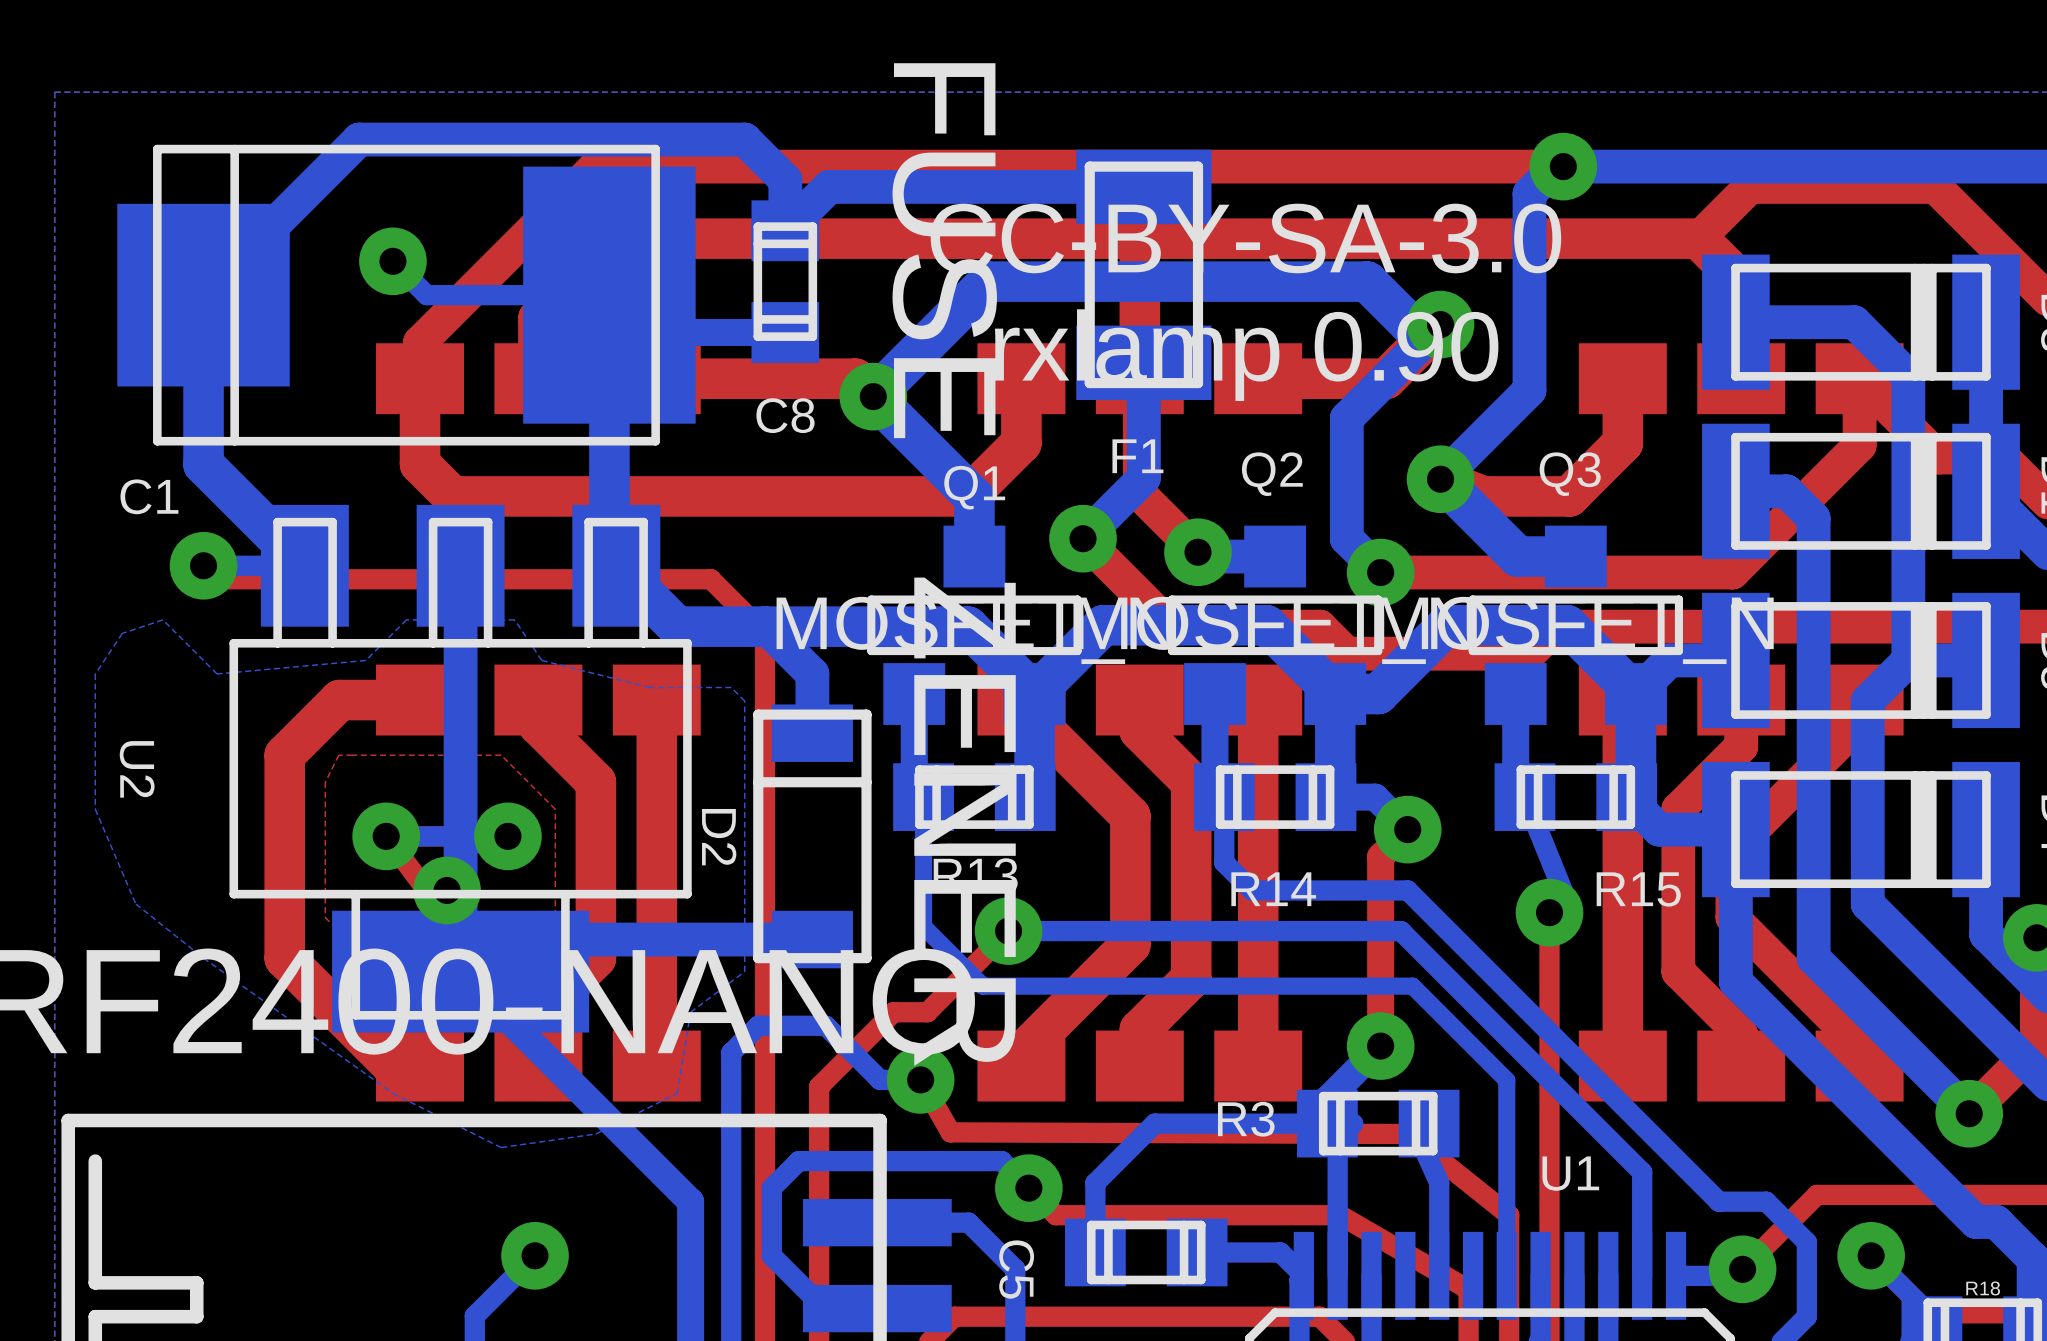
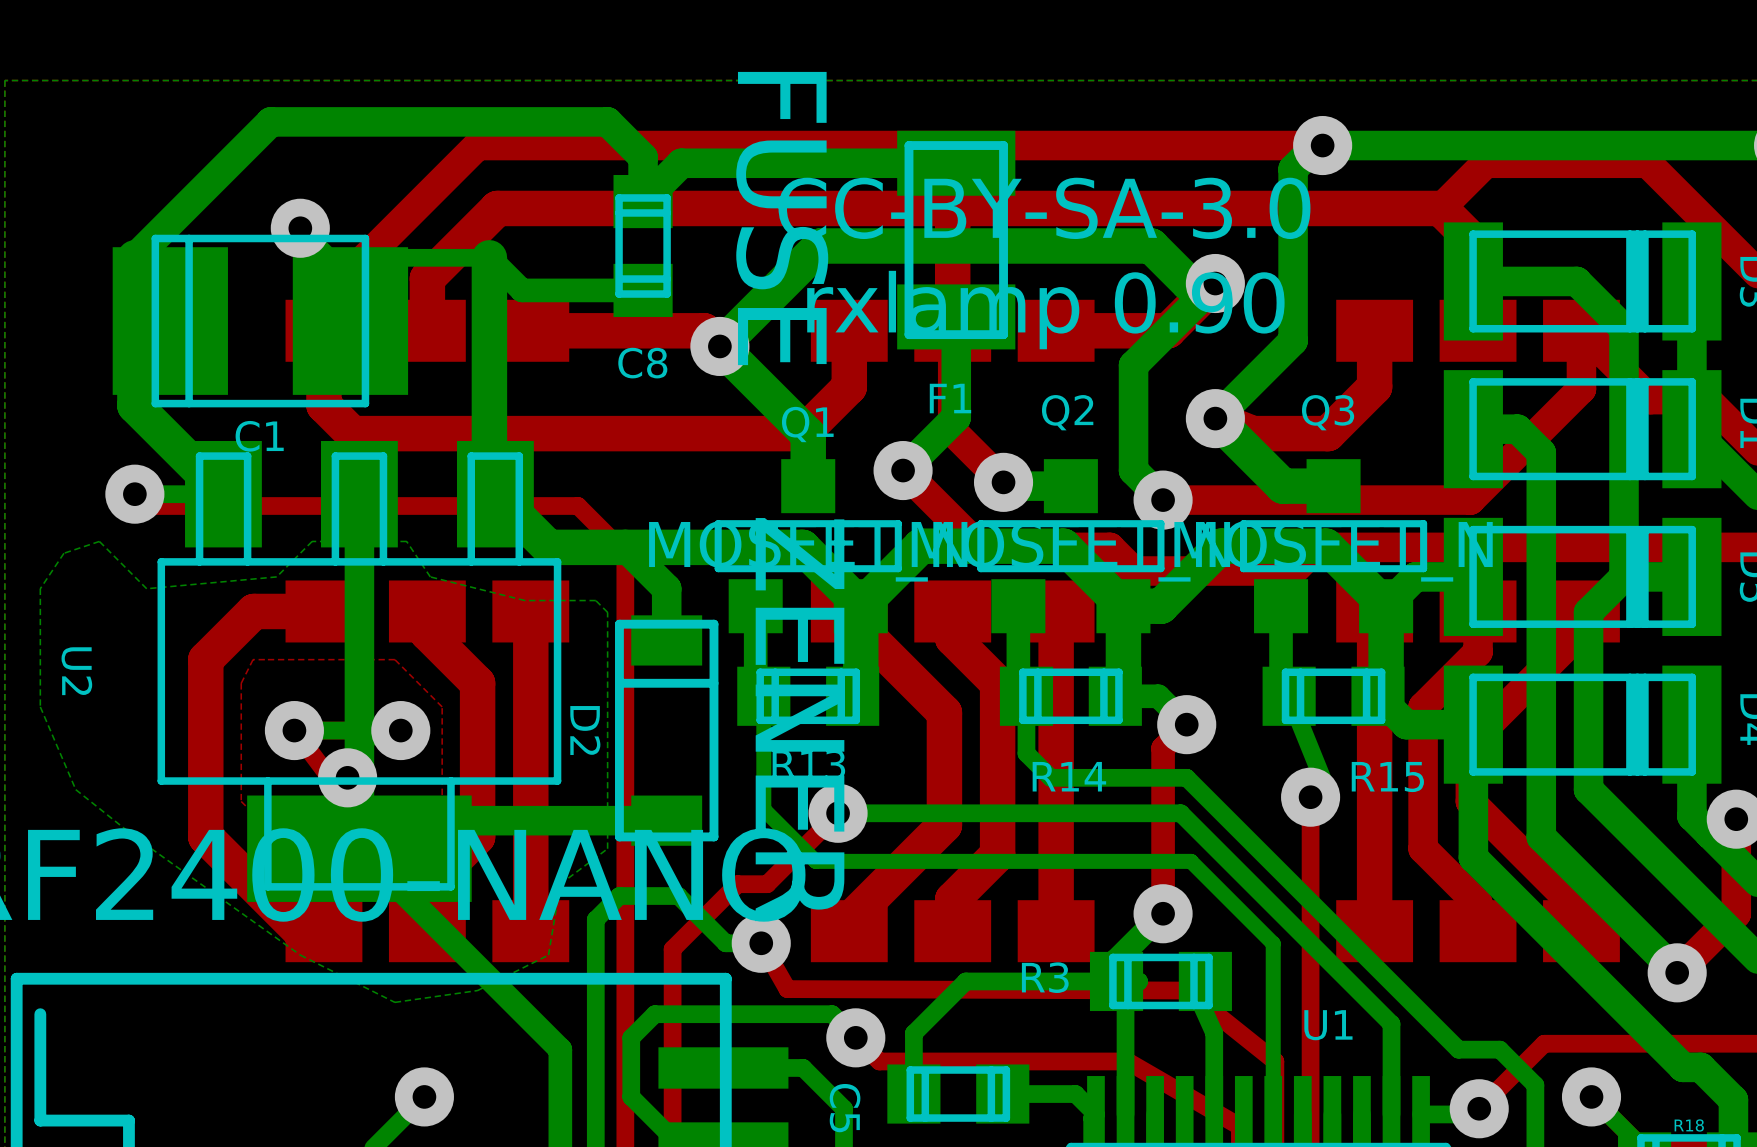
C1 footprint: [117, 144, 696, 446] -> [112, 234, 409, 408]
C1 name position: C1 (149, 496) -> C1 (259, 436)

